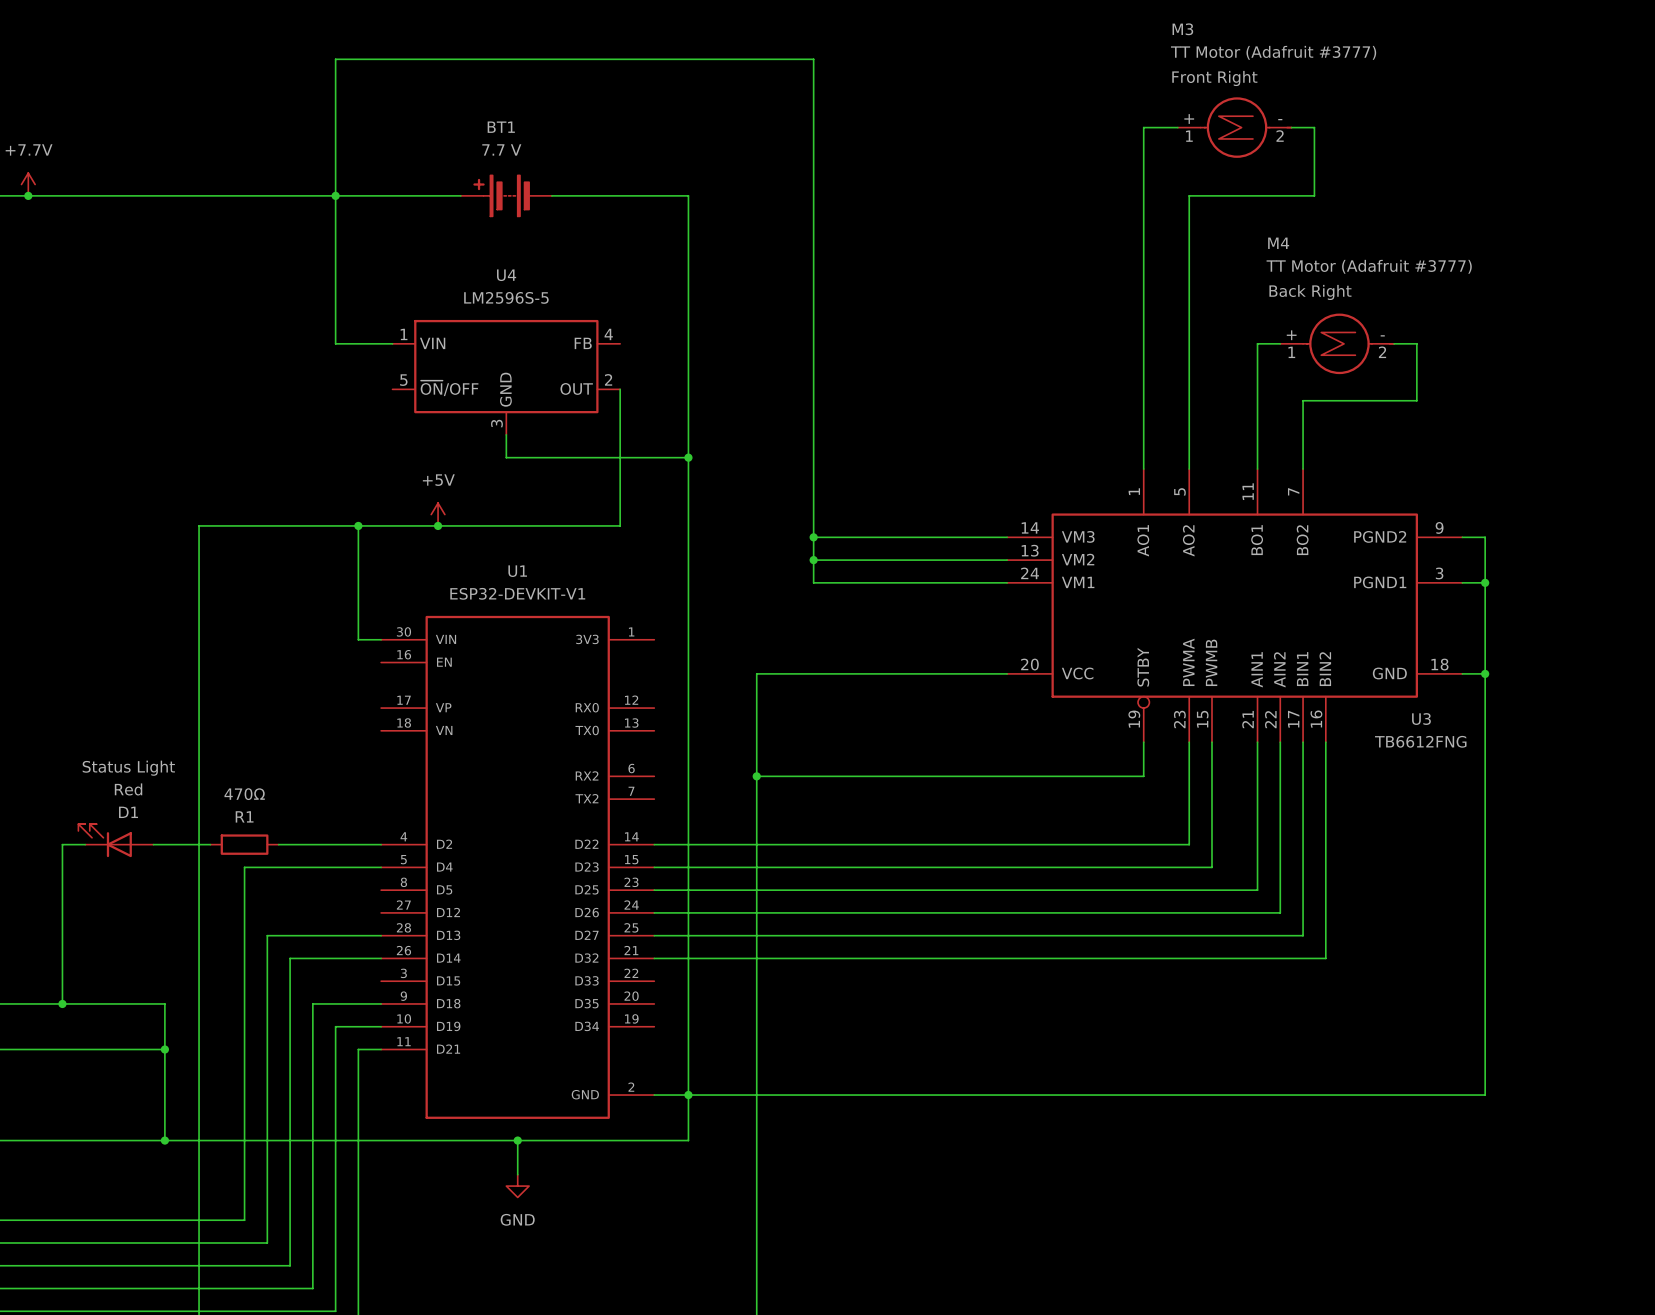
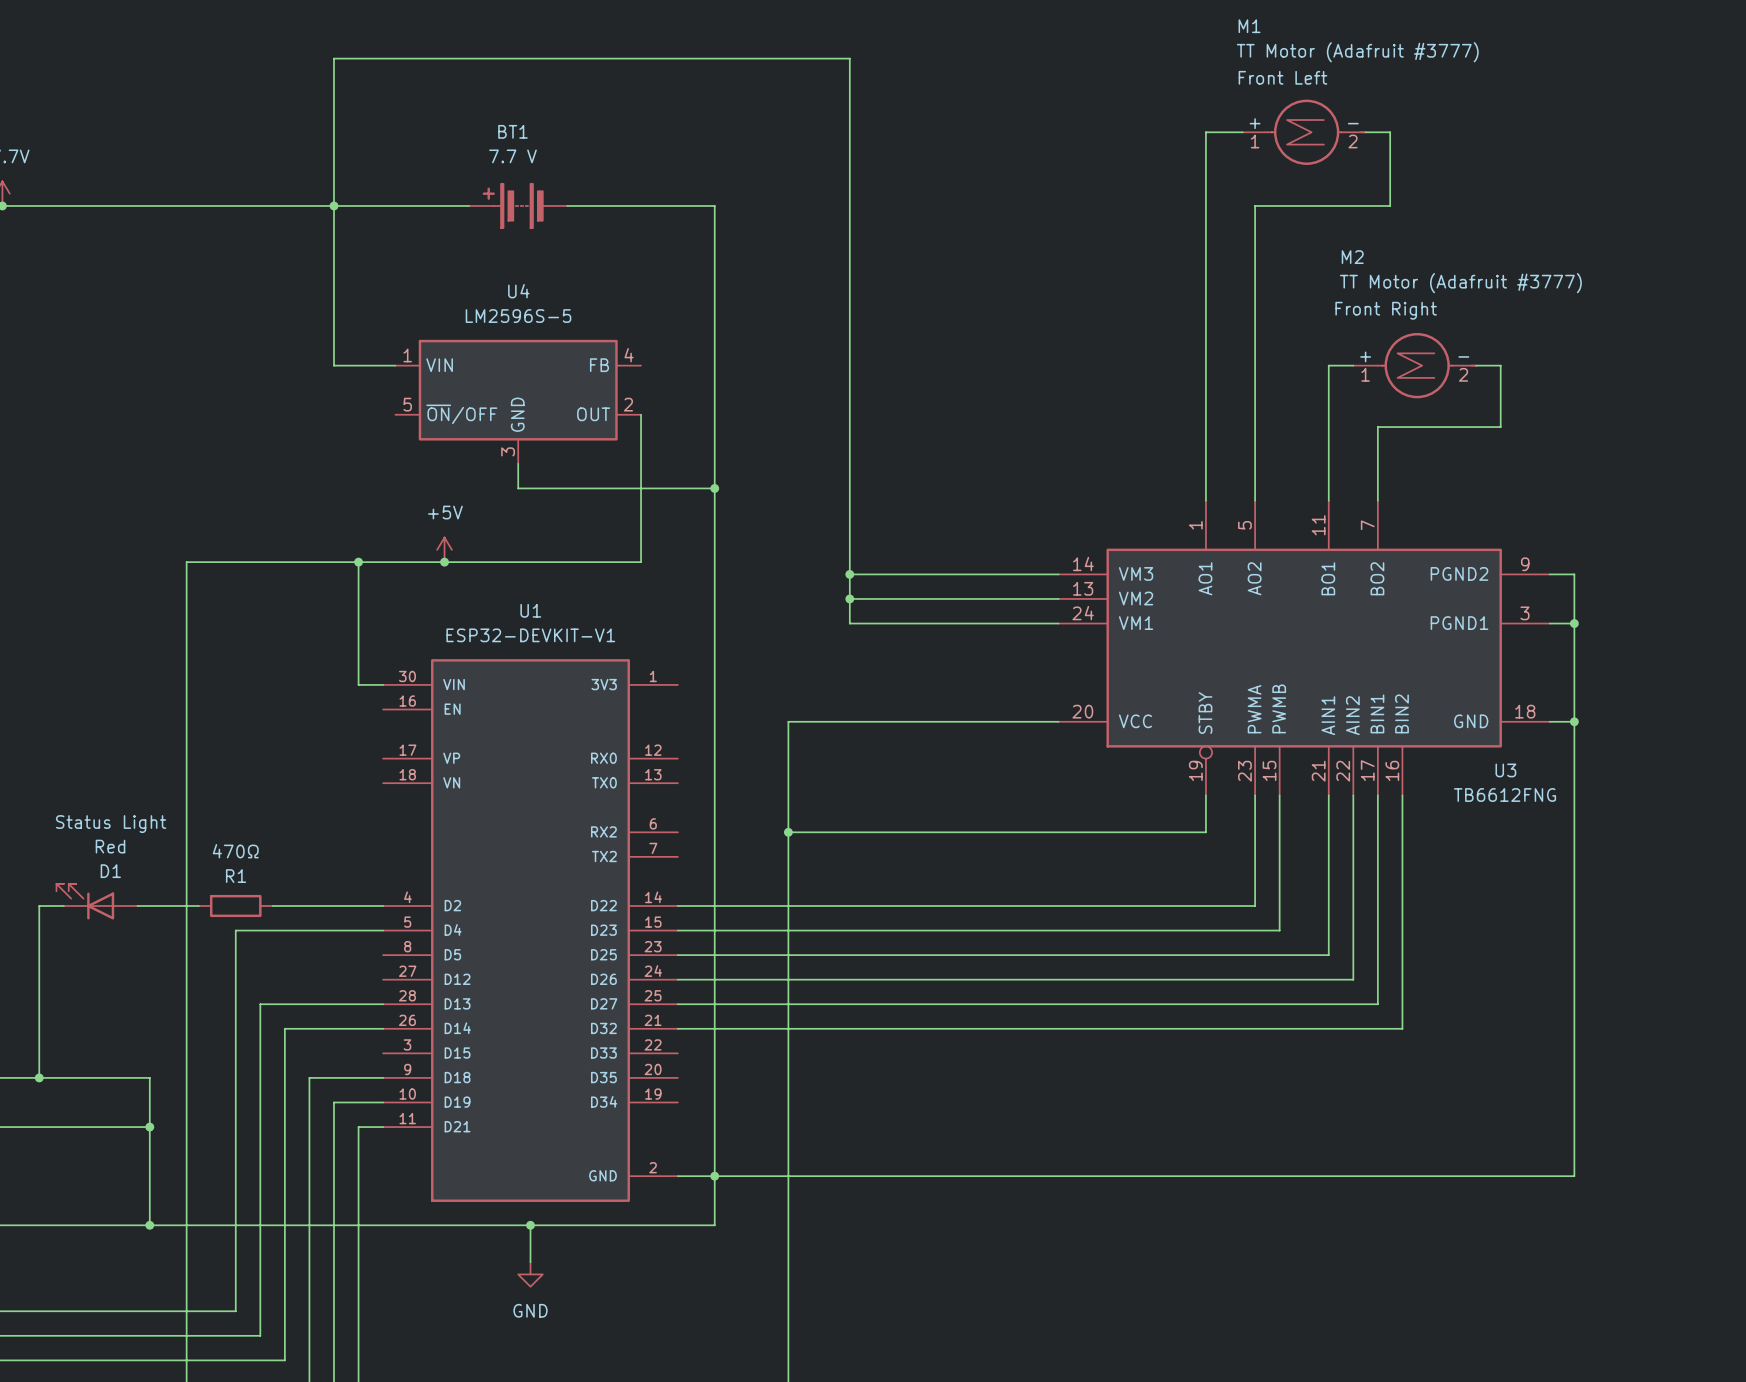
M3 name: M3 (1182, 29) -> M1 (1249, 26)
M3 text: Front Right (1214, 78) -> Front Left (1282, 77)
M4 name: M4 (1278, 243) -> M2 (1352, 257)
M4 text: Back Right (1310, 292) -> Front Right (1386, 310)

